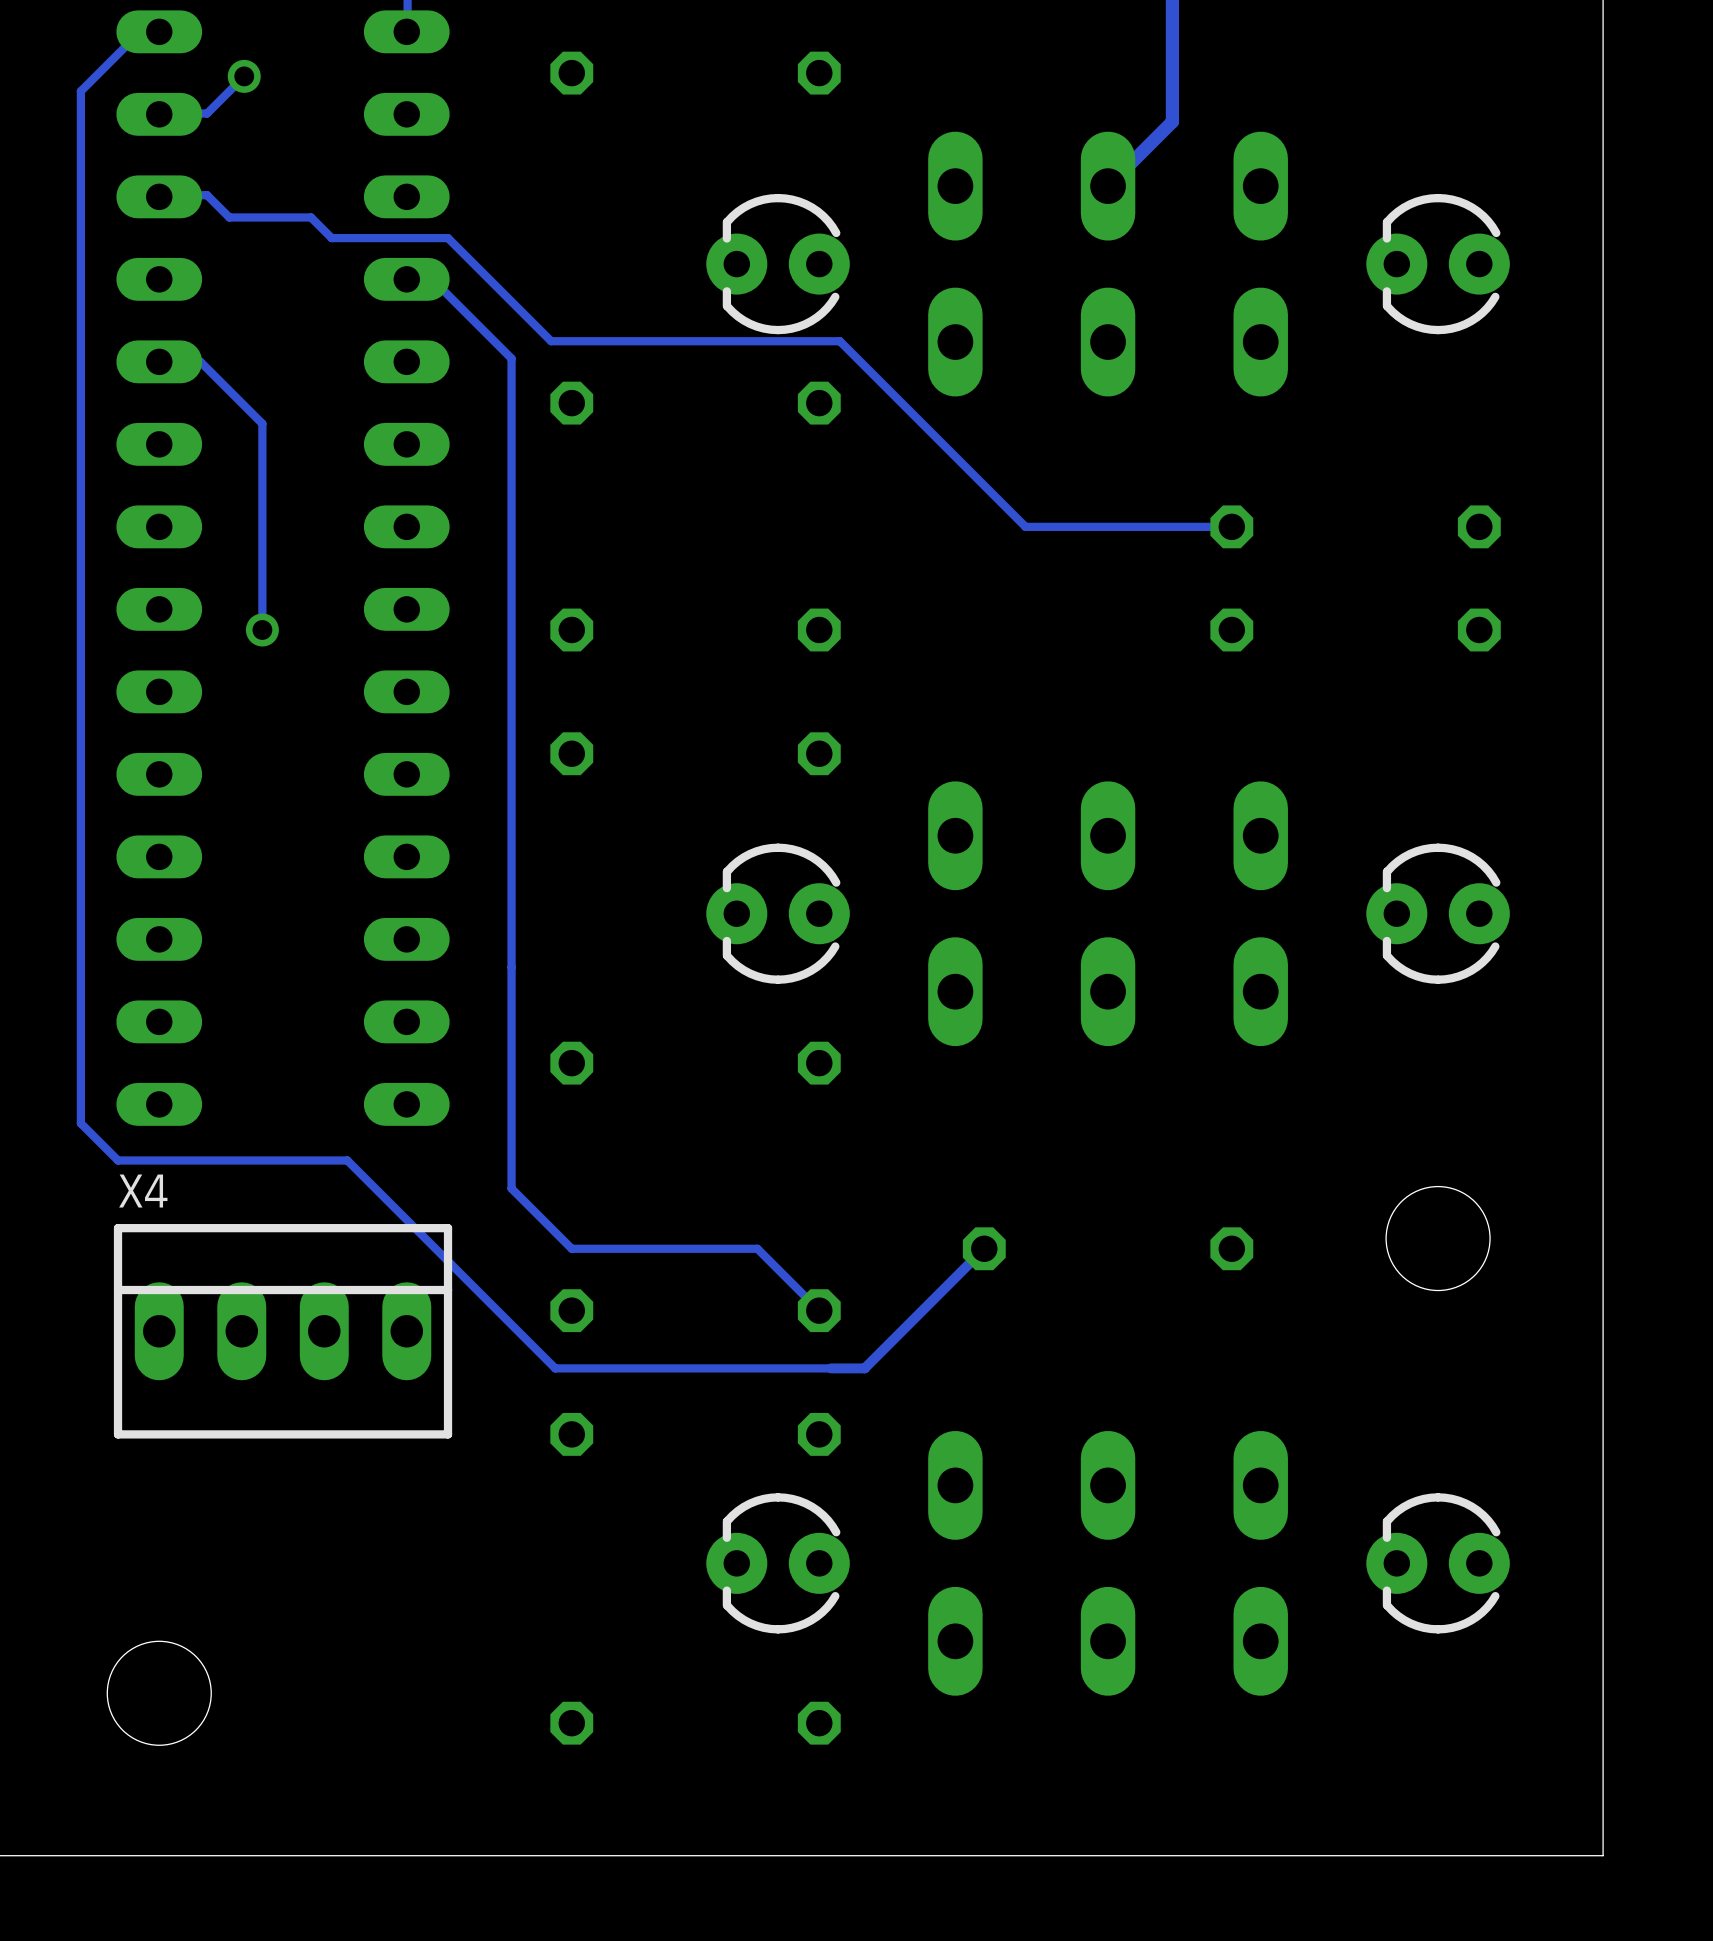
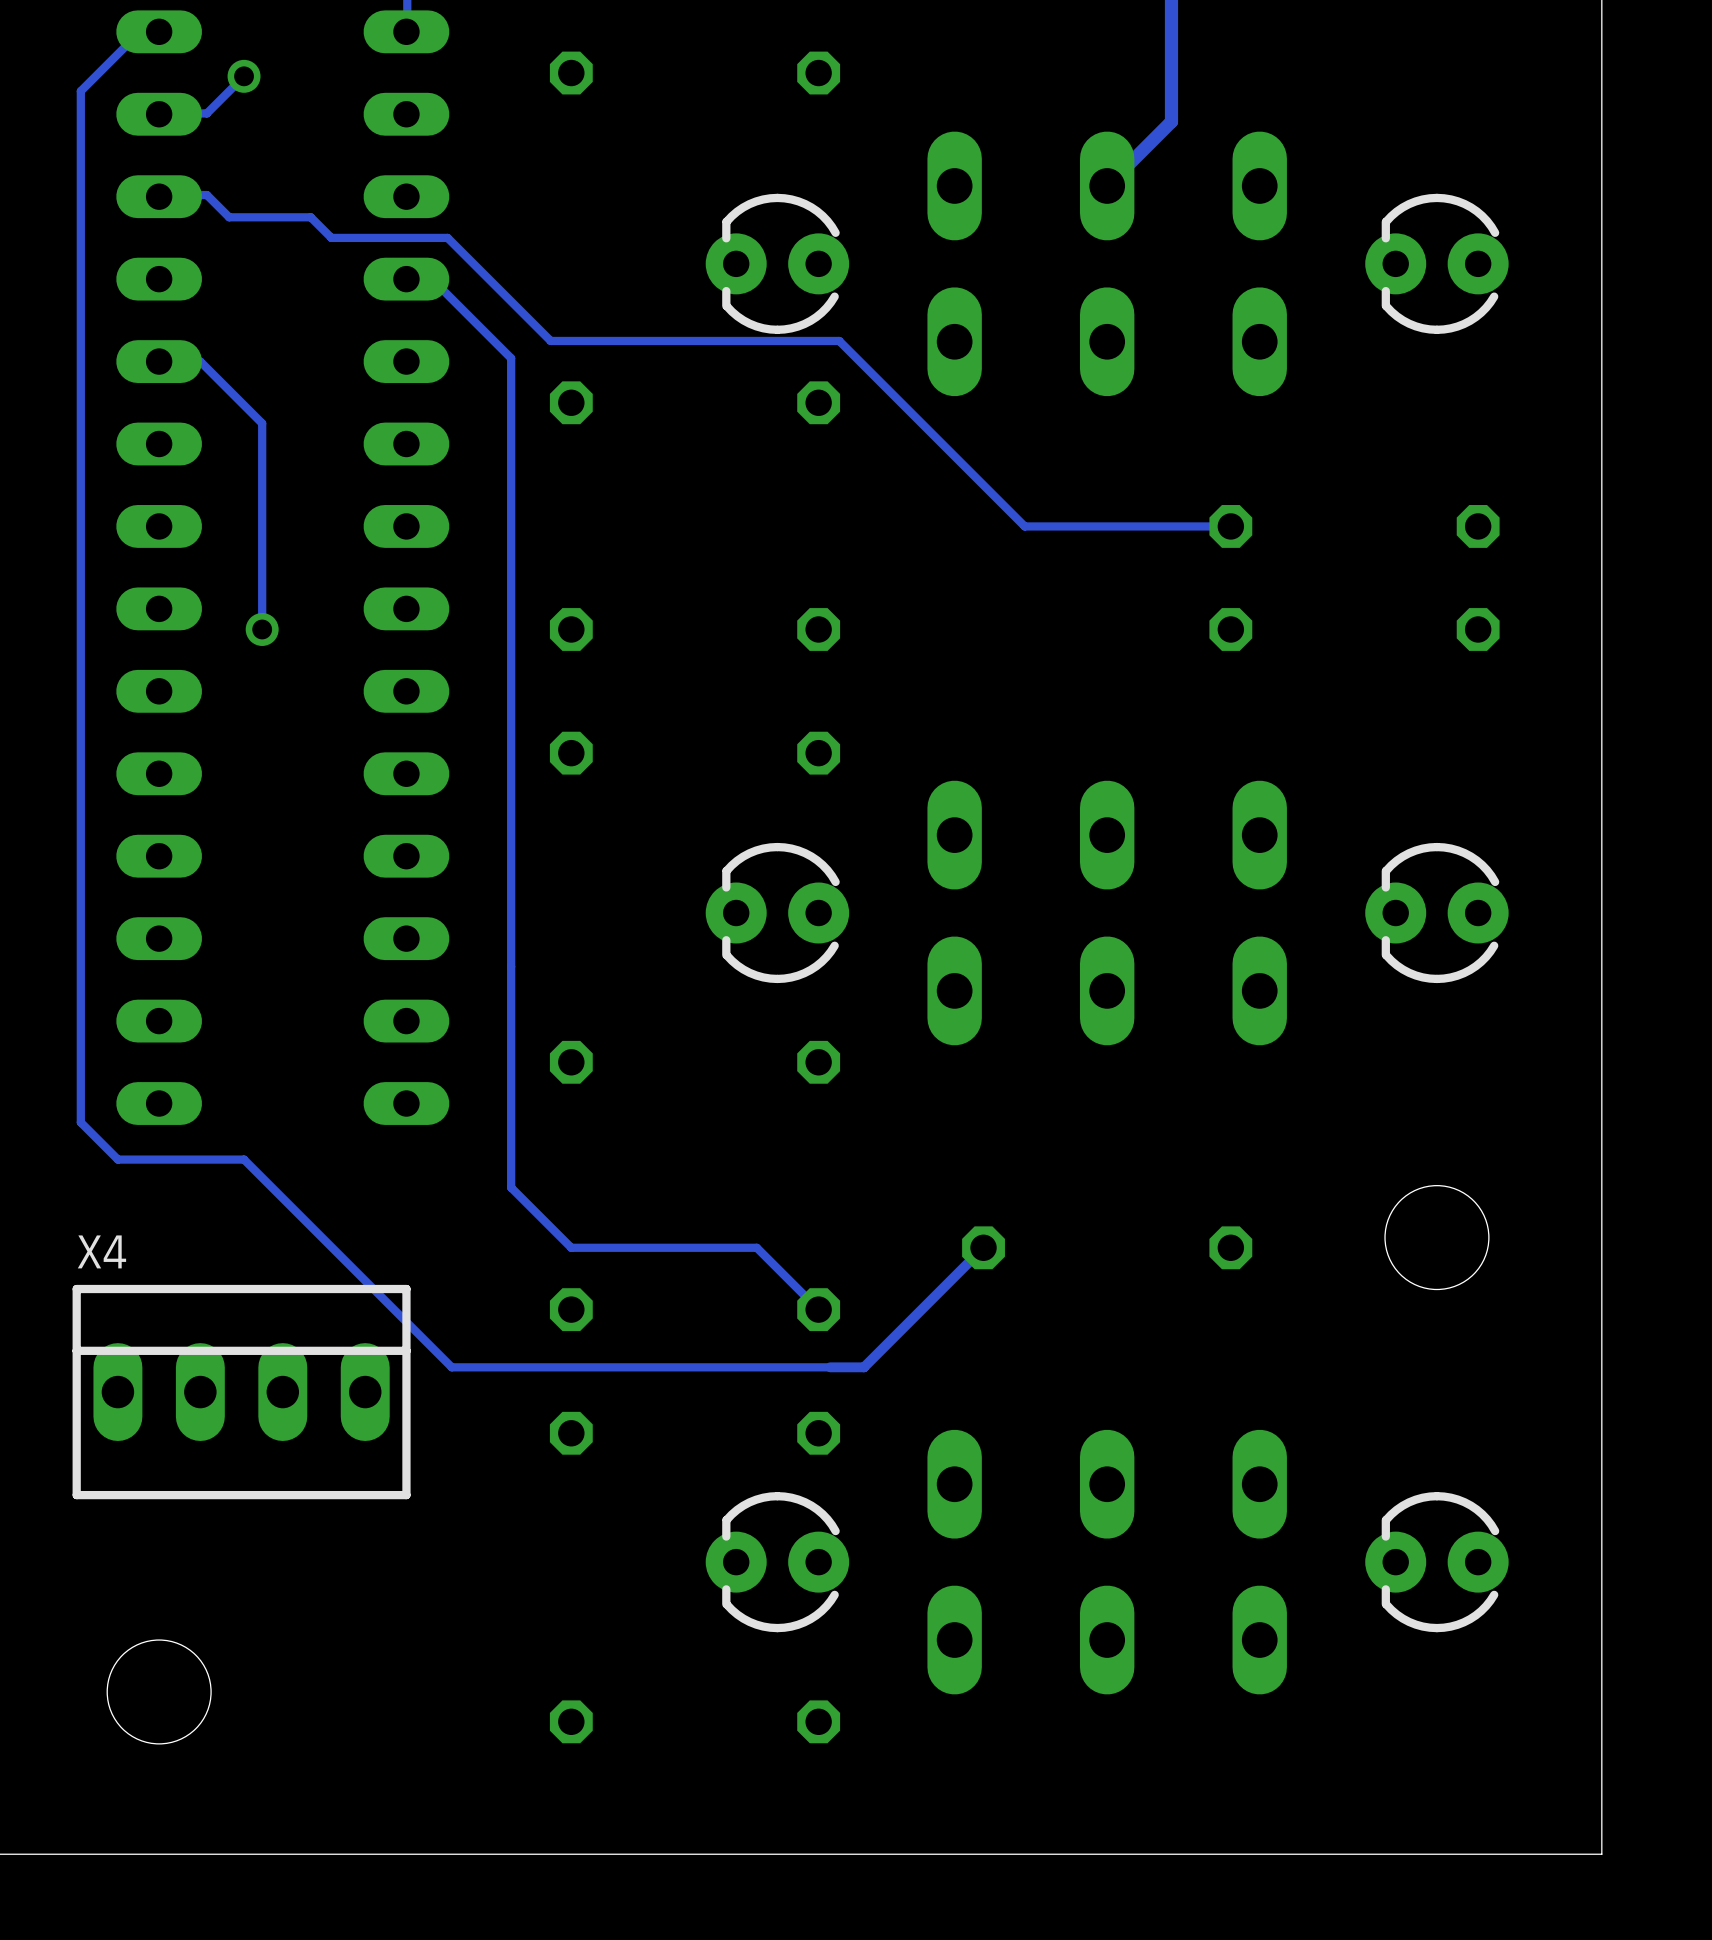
track: (244, 1160) (347, 1160) (555, 1368) -> (244, 1159) (451, 1367) (554, 1367)
X4 position: (283, 1331) -> (241, 1392)

